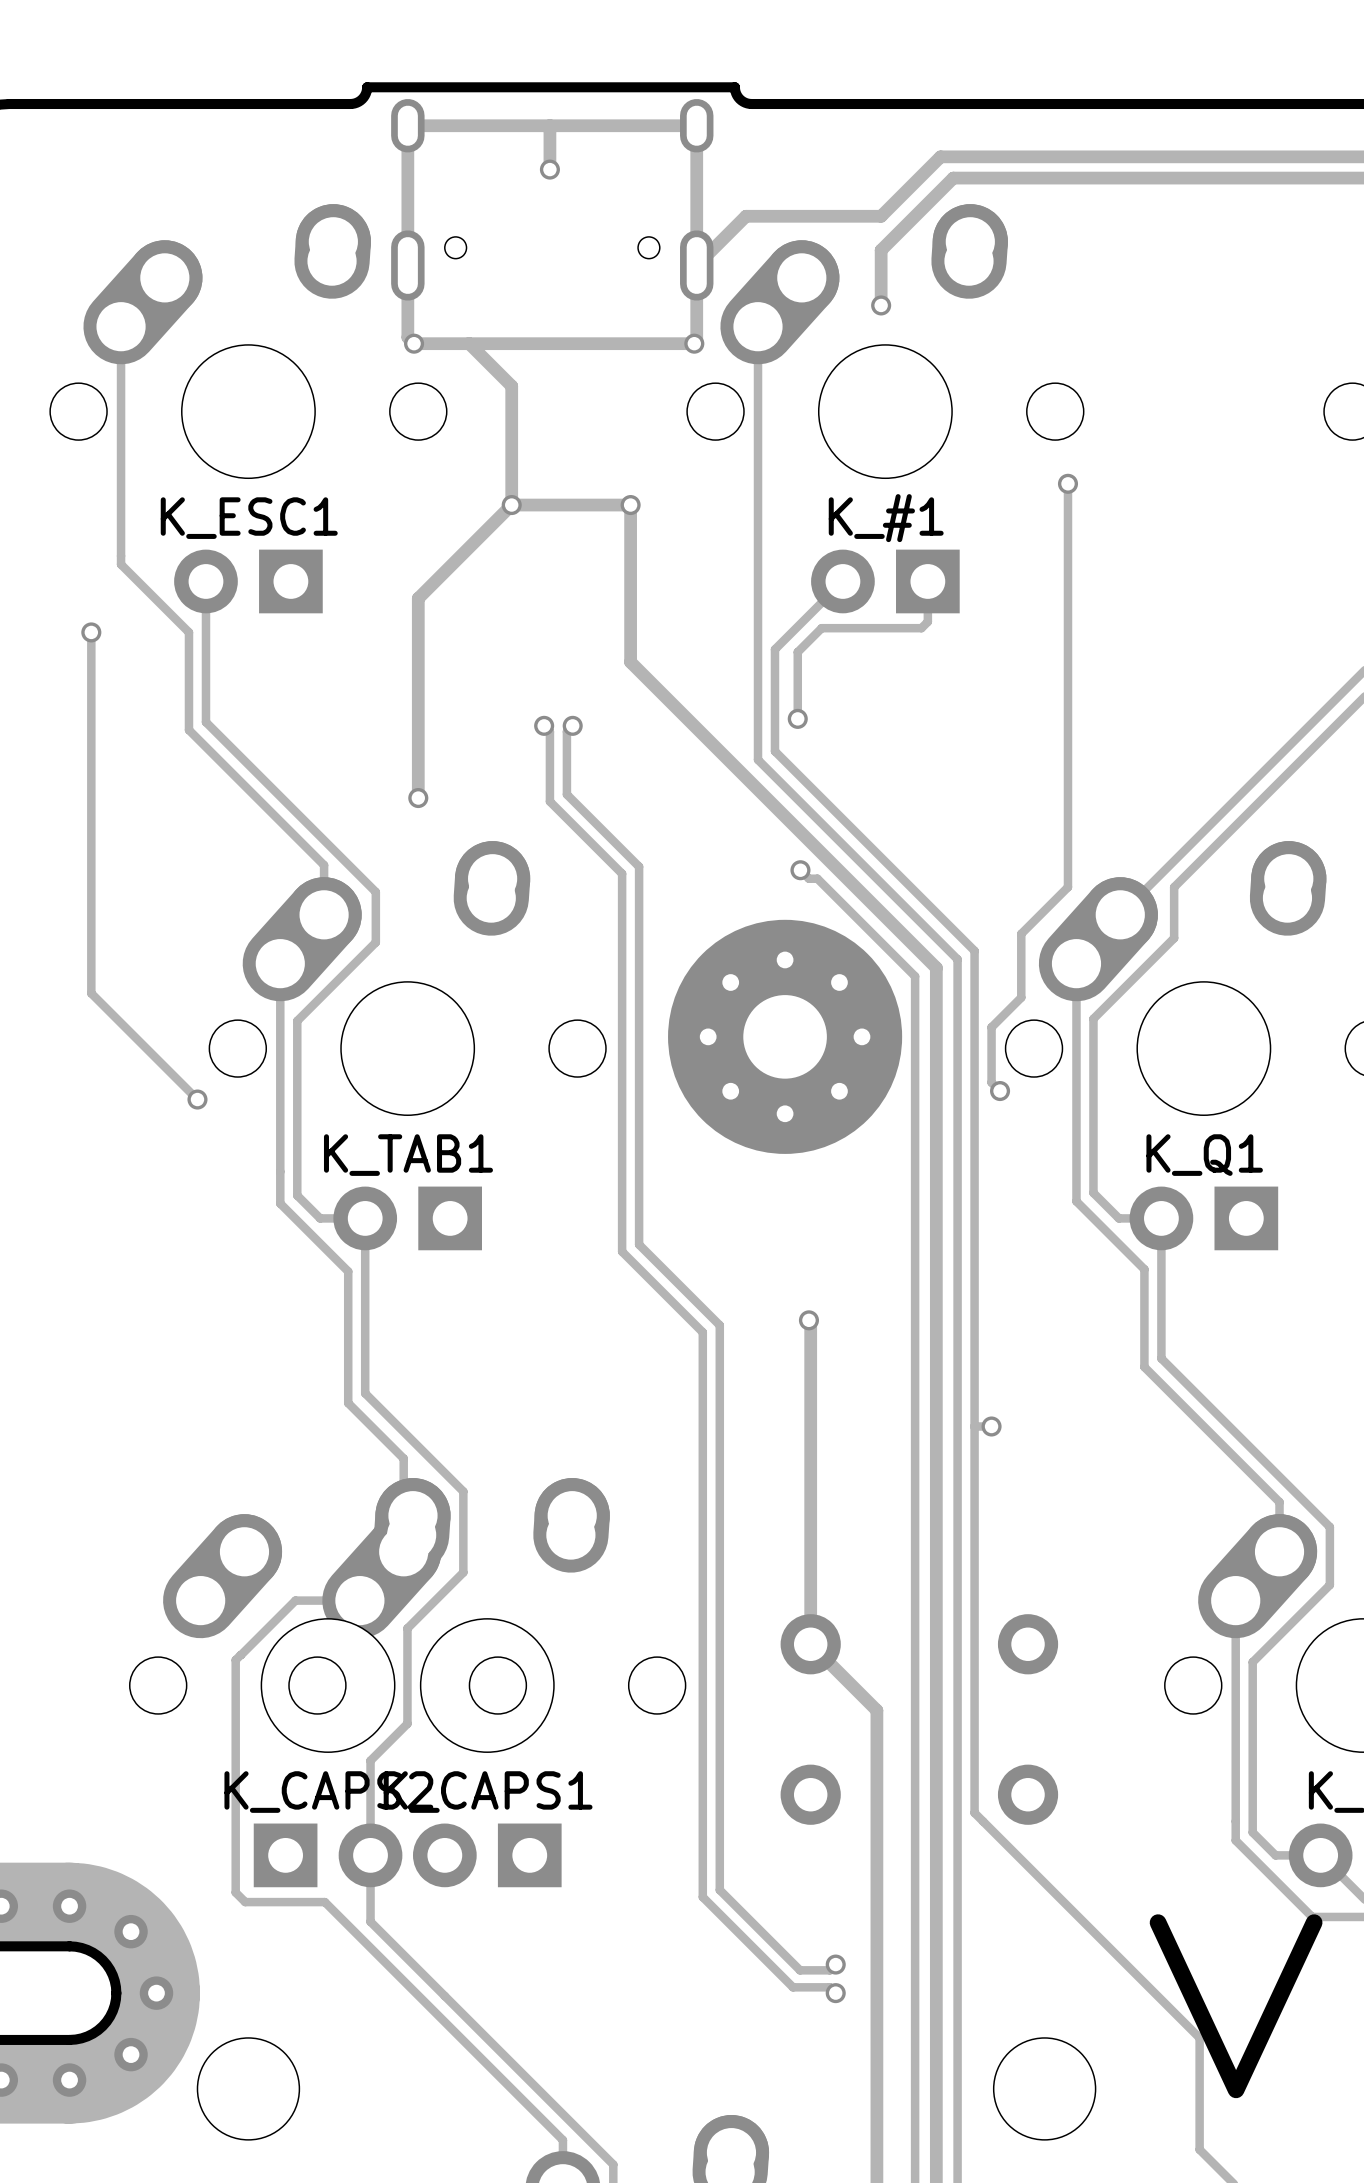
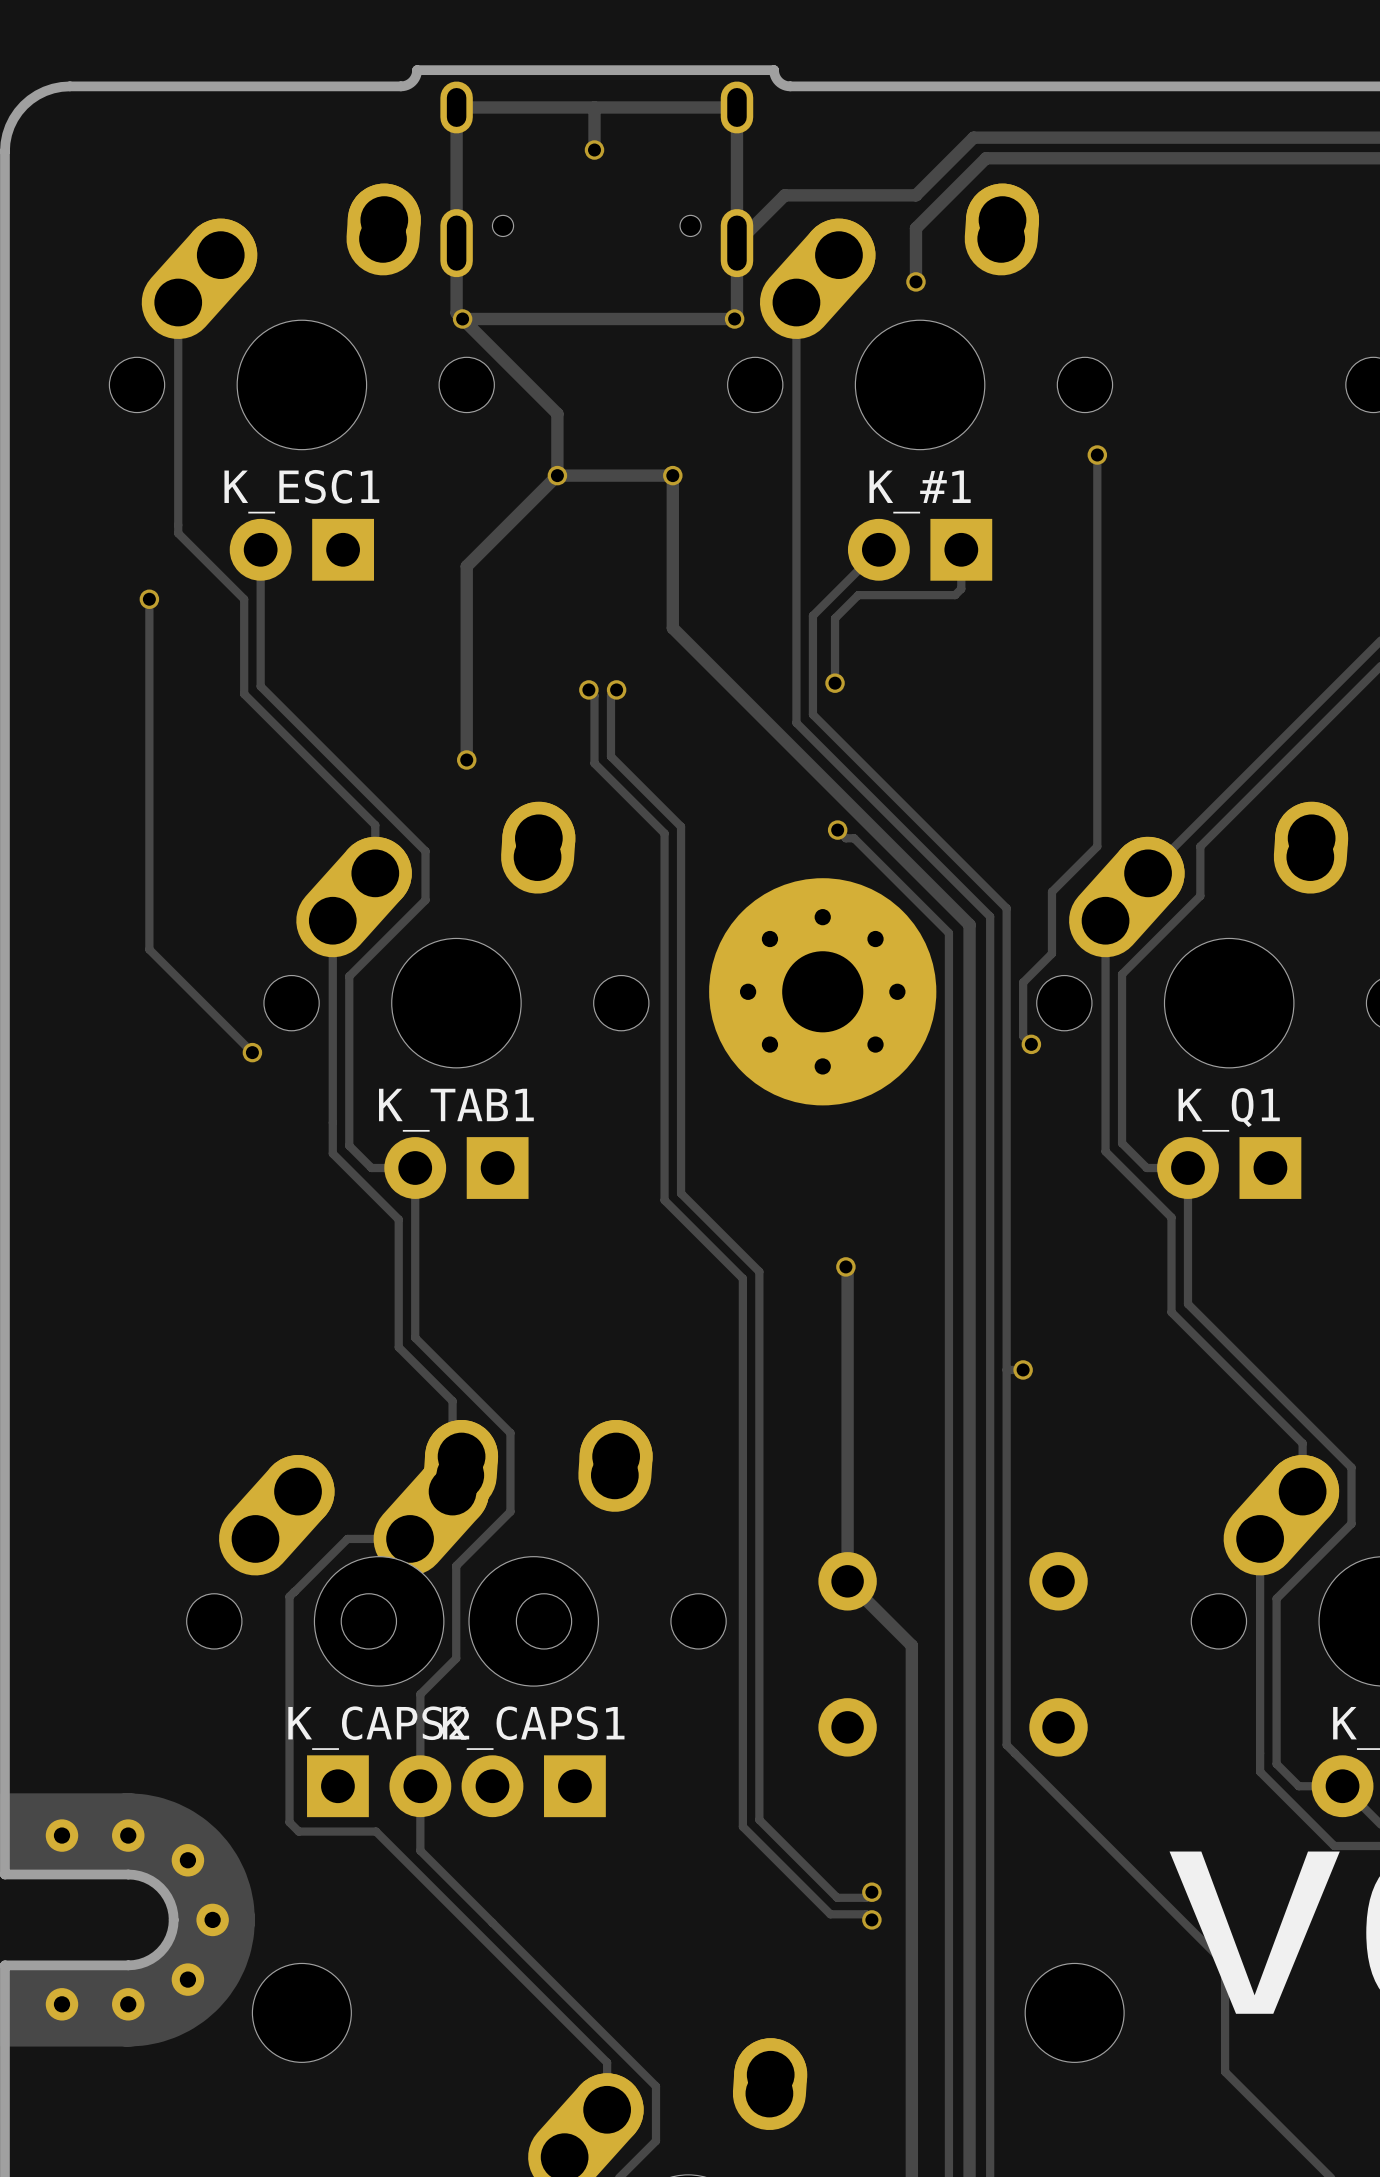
track: (469, 343) (511, 386) (511, 441) -> (462, 318) (557, 413)

